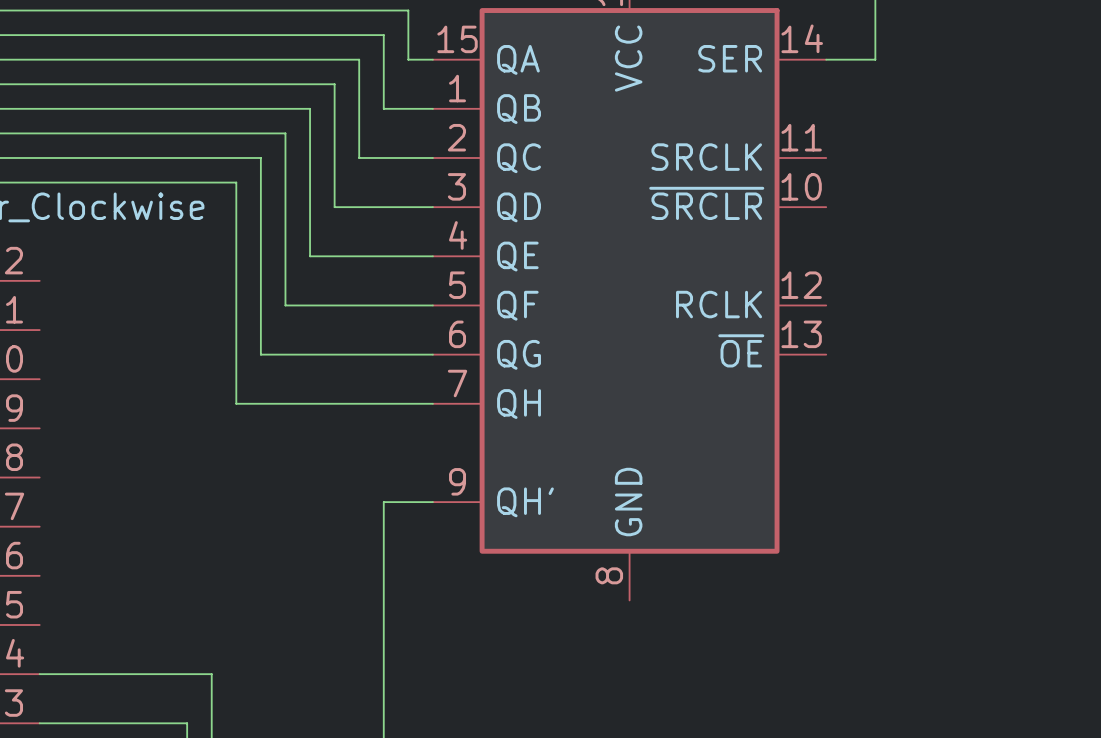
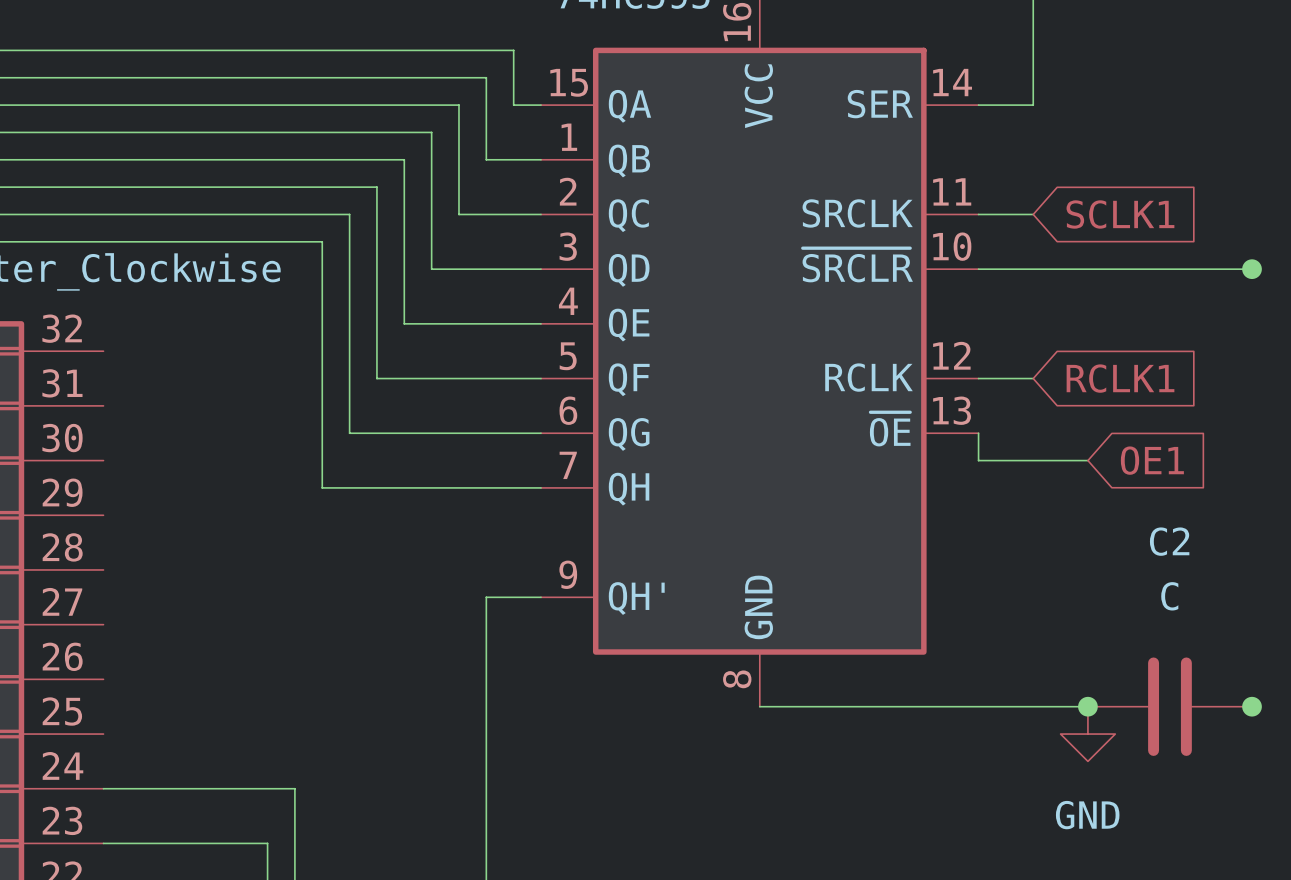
wire: none -> (978, 214) (1033, 214)
global label: none -> SCLK1 (1120, 214)
wire: none -> (978, 269) (1252, 269)
junction: none -> (1252, 269)
wire: none -> (978, 378) (1033, 378)
global label: none -> RCLK1 (1120, 378)
wire: none -> (978, 433) (978, 460) (1087, 460)
global label: none -> OE1 (1152, 460)
wire: none -> (759, 706) (1087, 706)
junction: none -> (1087, 706)
C2: none -> C (1169, 706)
junction: none -> (1252, 706)
power symbol: none -> GND (1087, 734)

